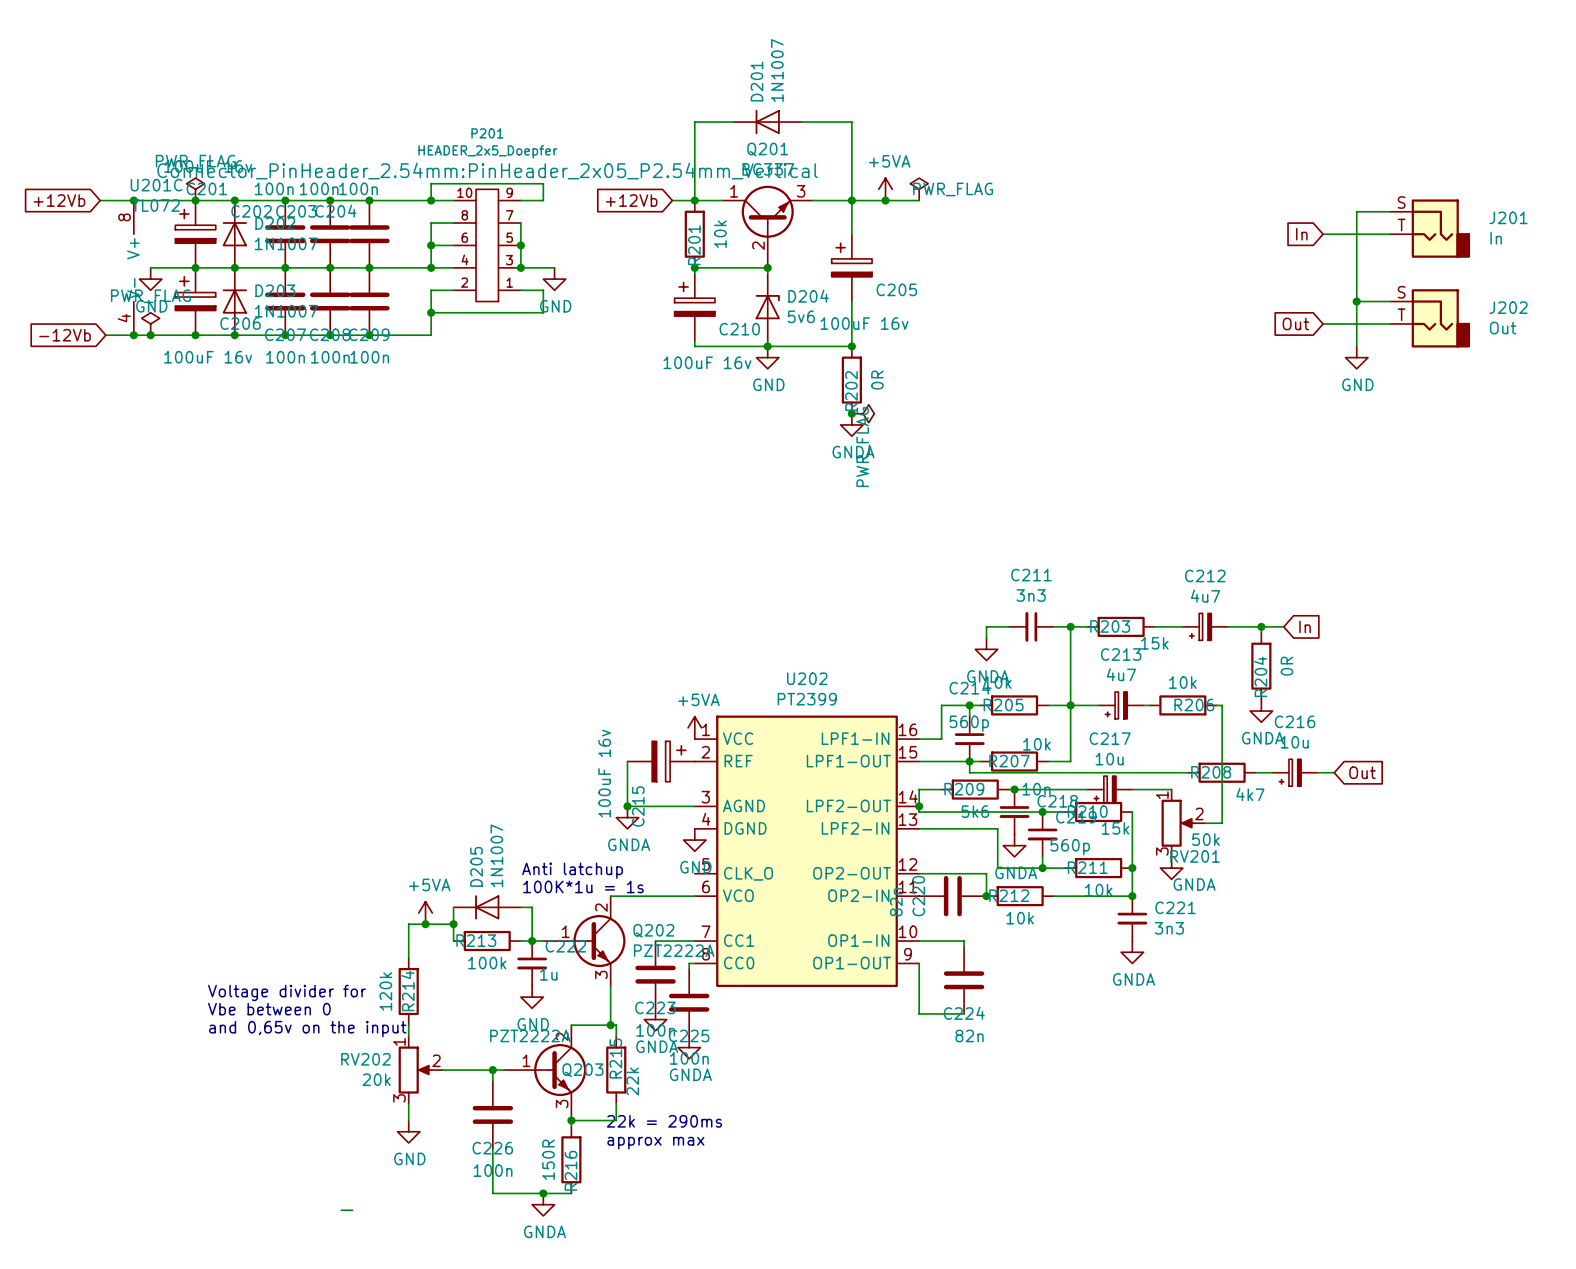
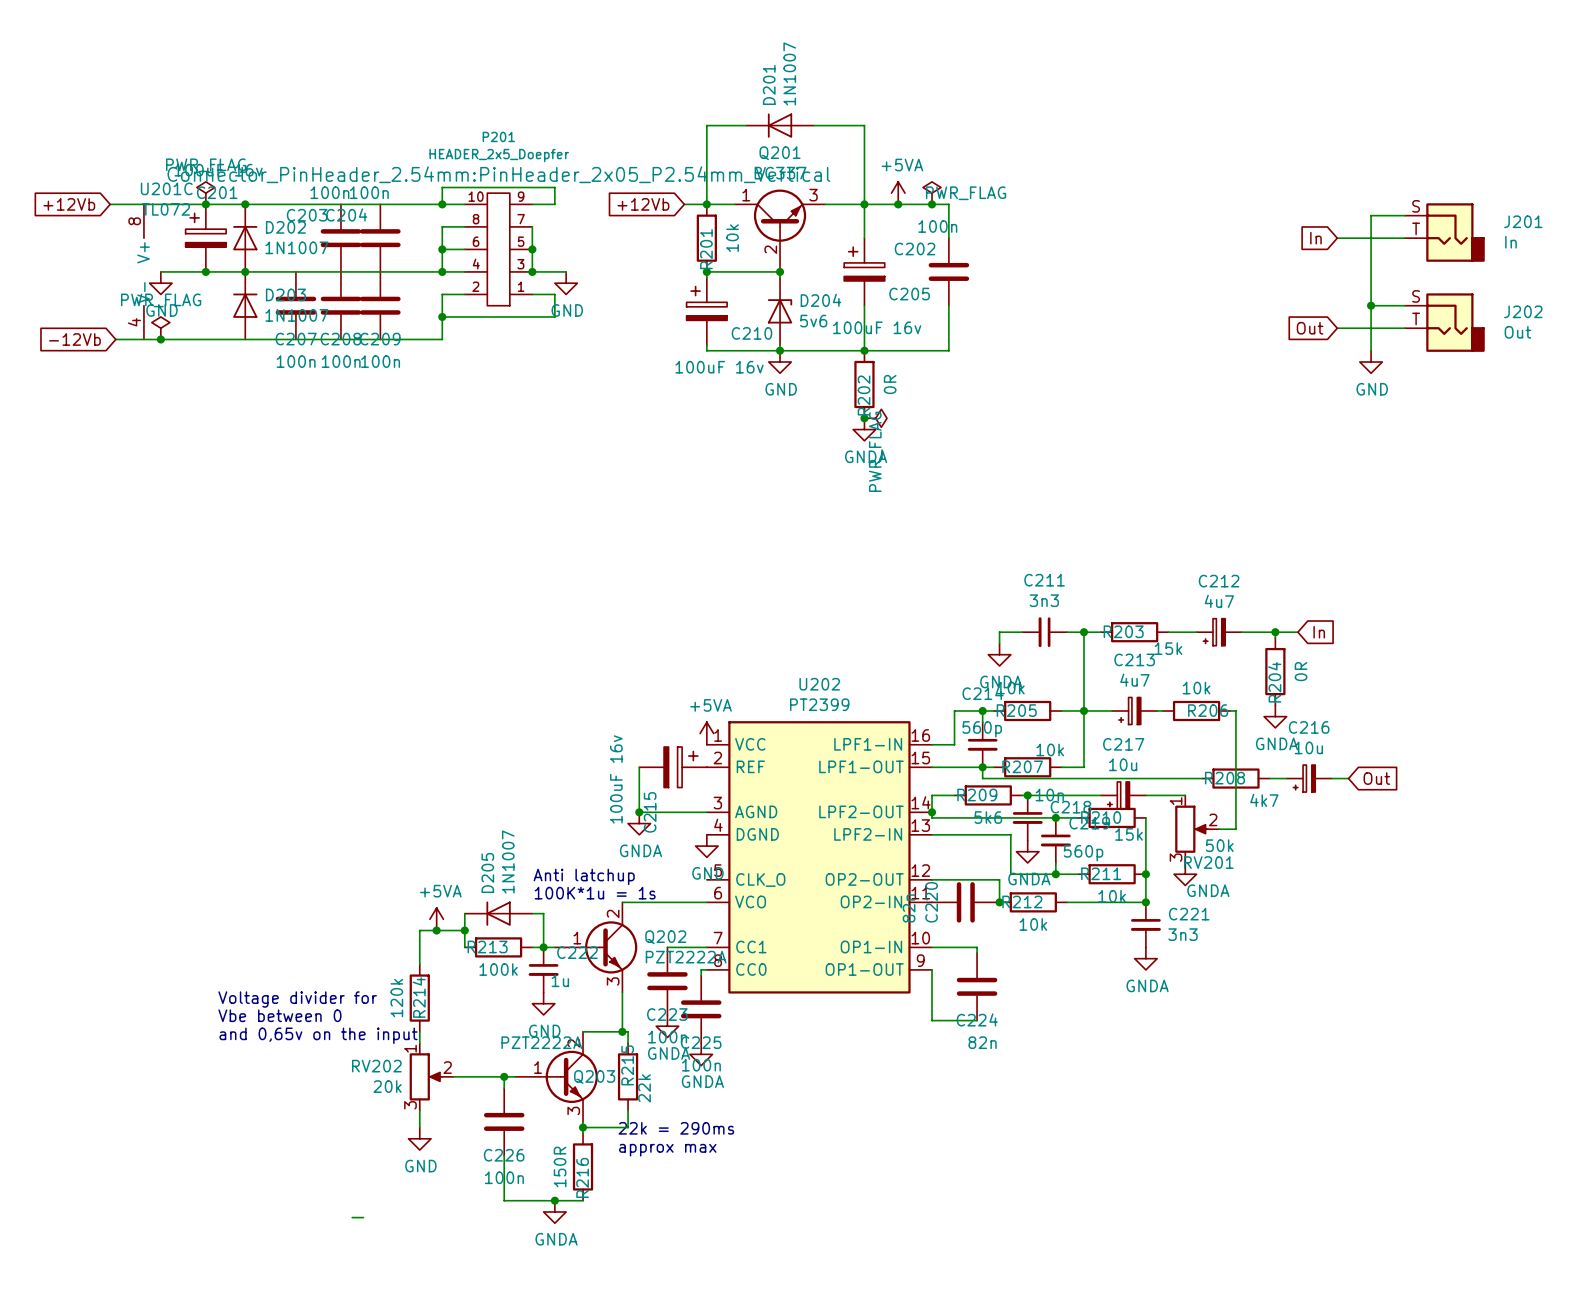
junction: (133, 200) -> none
junction: (285, 200) -> none
junction: (330, 200) -> none
junction: (369, 200) -> none
wire: none -> (932, 204) (948, 204) (948, 238)
junction: none -> (932, 204)
C202 position: (285, 234) -> (948, 271)
junction: (285, 267) -> none
junction: (330, 267) -> none
junction: (369, 267) -> none
C206: 100uF 16v (195, 301) -> none
wire: none -> (948, 305) (948, 350) (864, 350)
junction: (133, 335) -> none
junction: (195, 335) -> none
junction: (234, 335) -> none
junction: (285, 335) -> none
junction: (330, 335) -> none
junction: (369, 335) -> none

